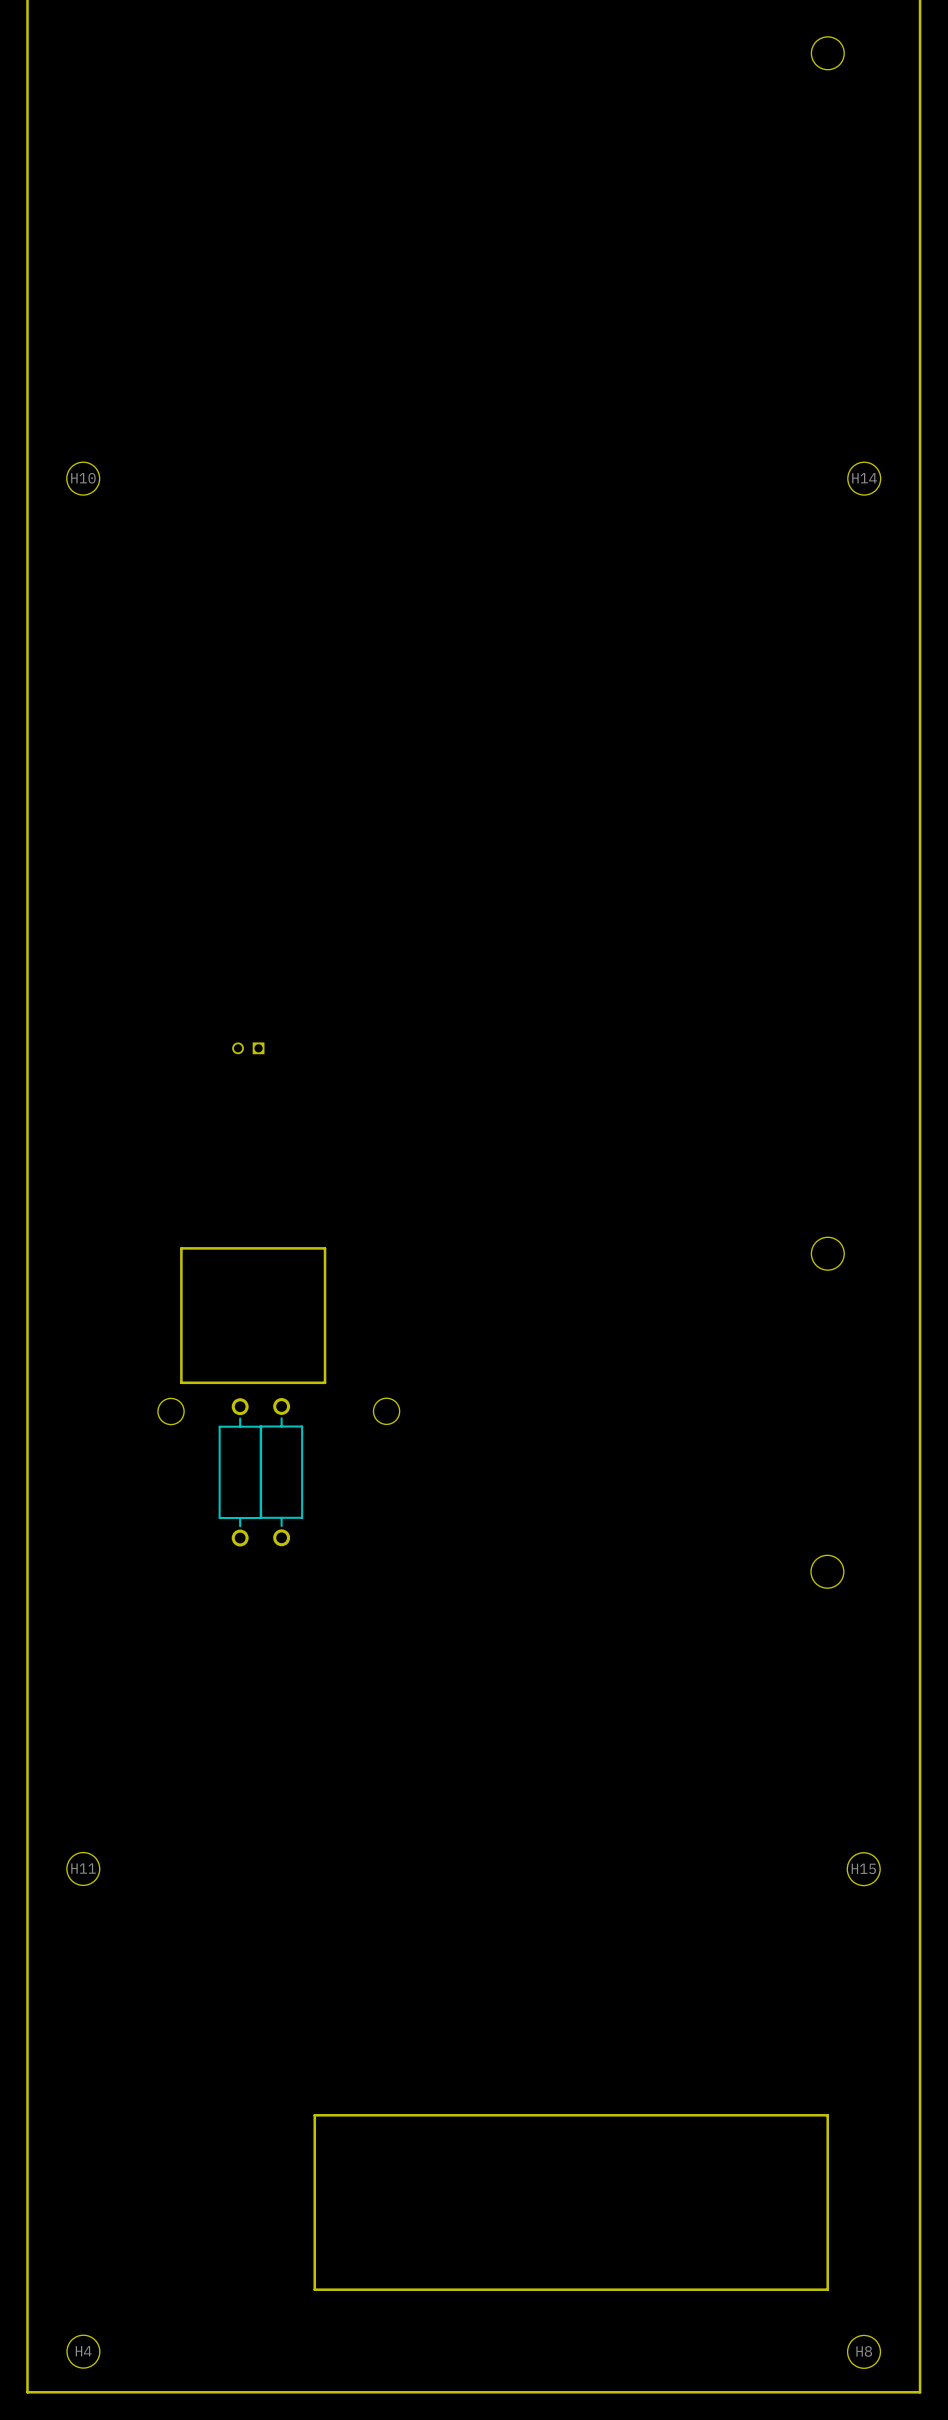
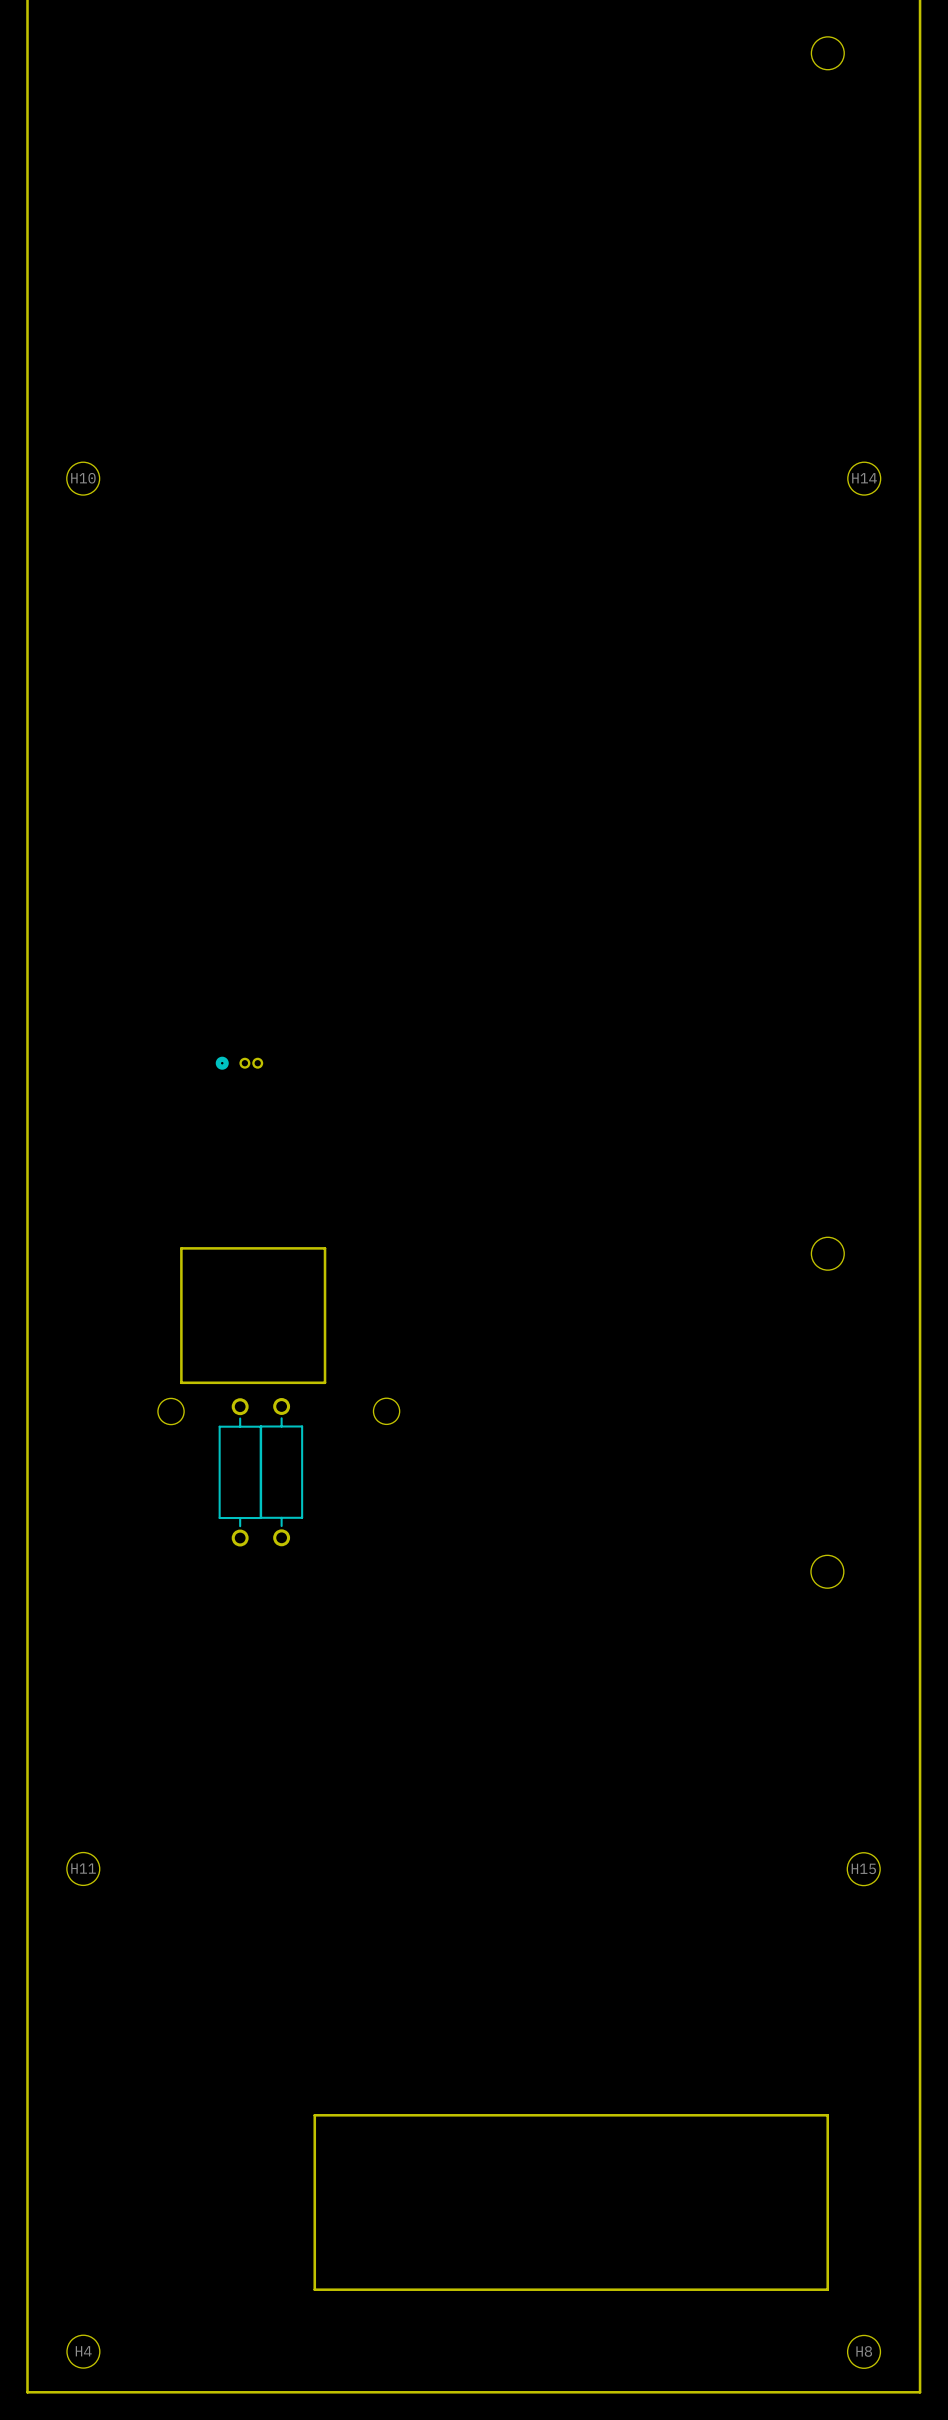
part: (248, 1048) -> none
part: none -> (239, 1063)

